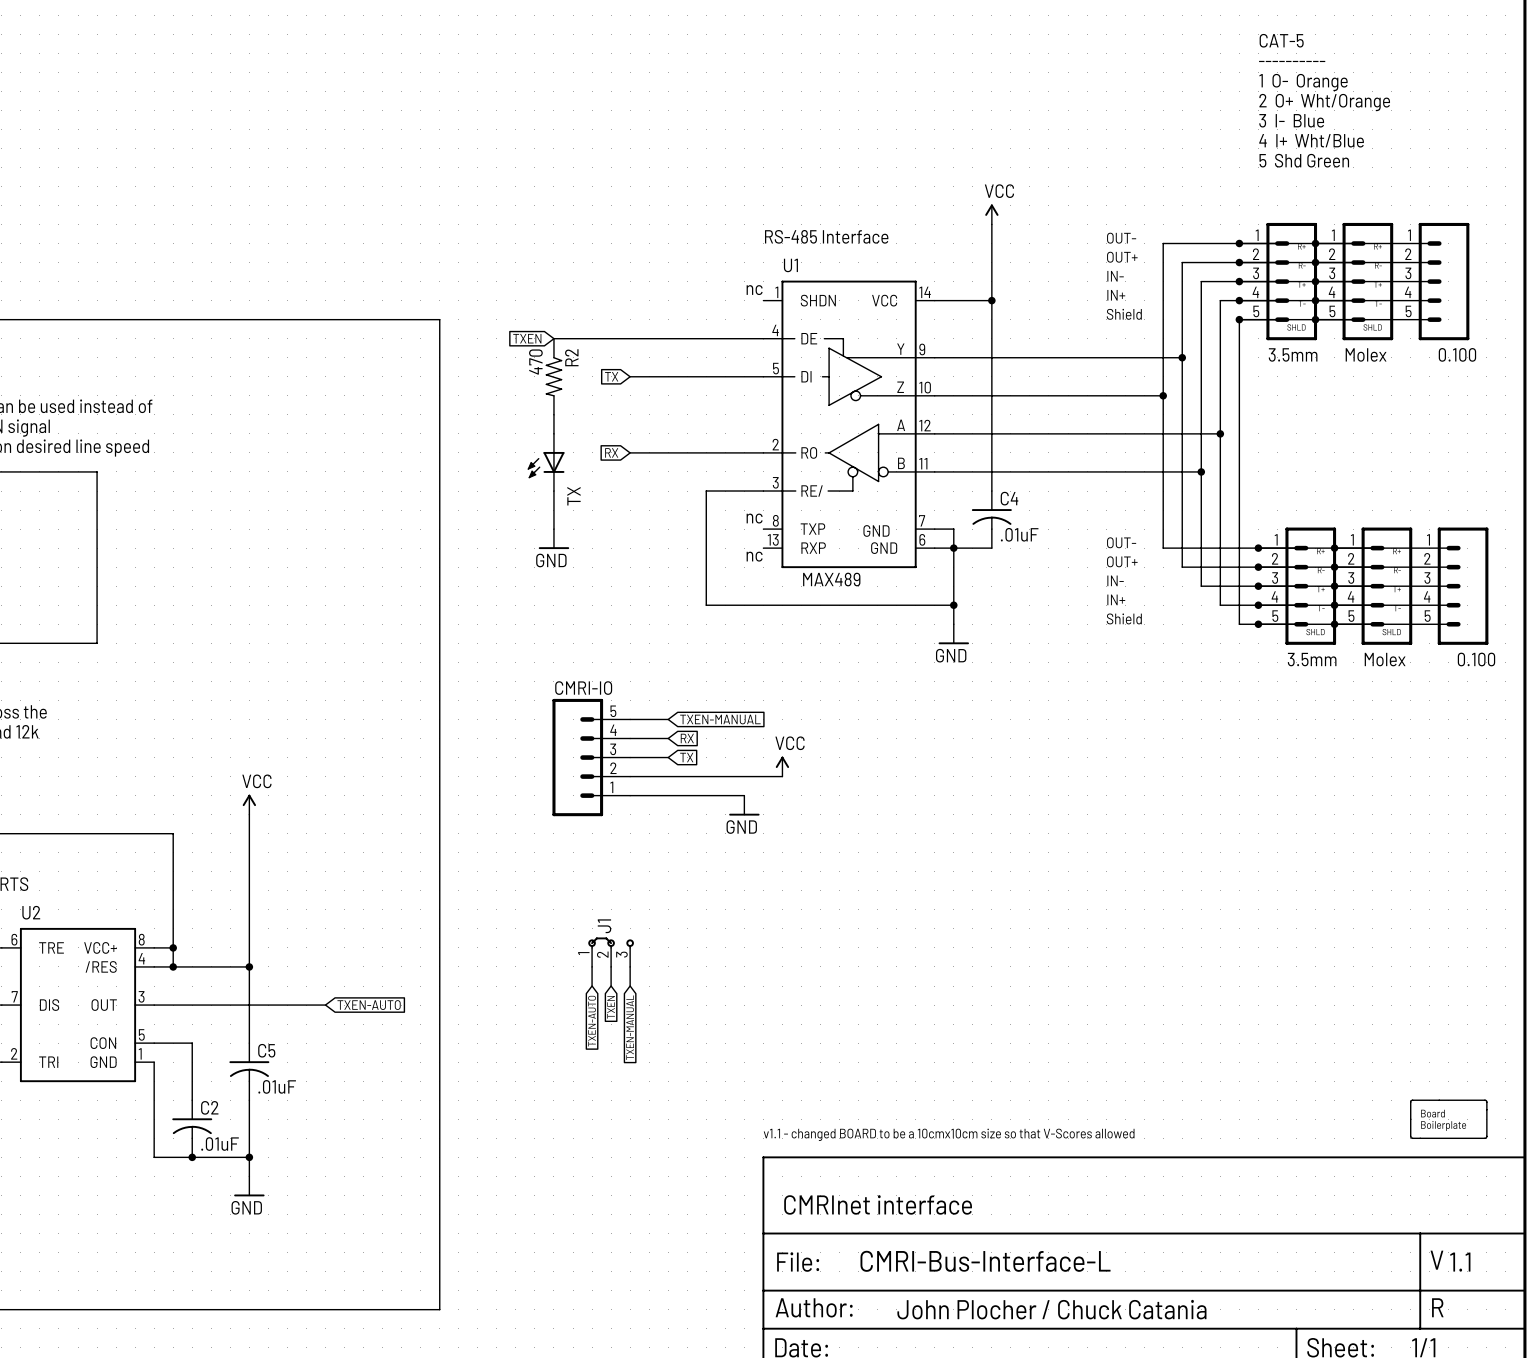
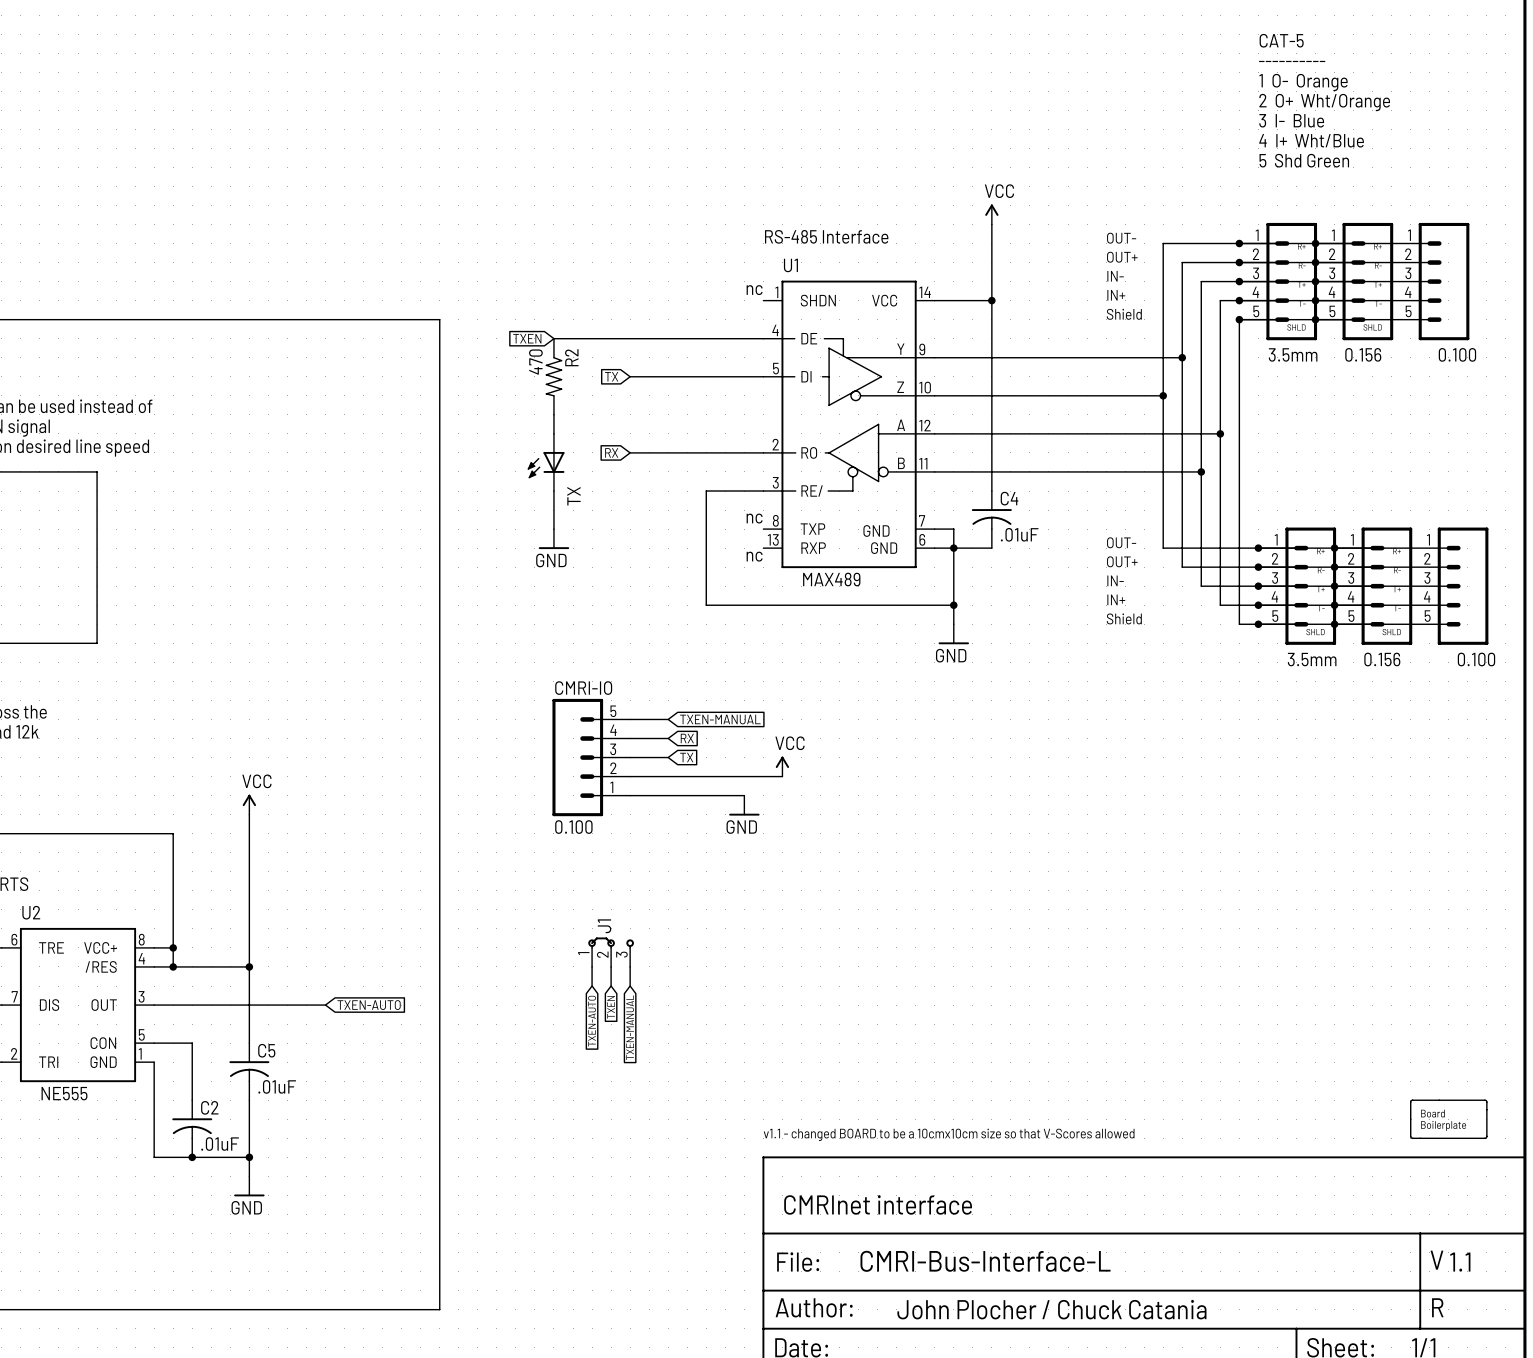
part value: Molex (1366, 354) -> 0.156 (1363, 354)
part value: Molex (1385, 659) -> 0.156 (1382, 659)
CMRI-IO value: none -> 0.100 (573, 827)
U2 value: none -> NE555 (64, 1093)

